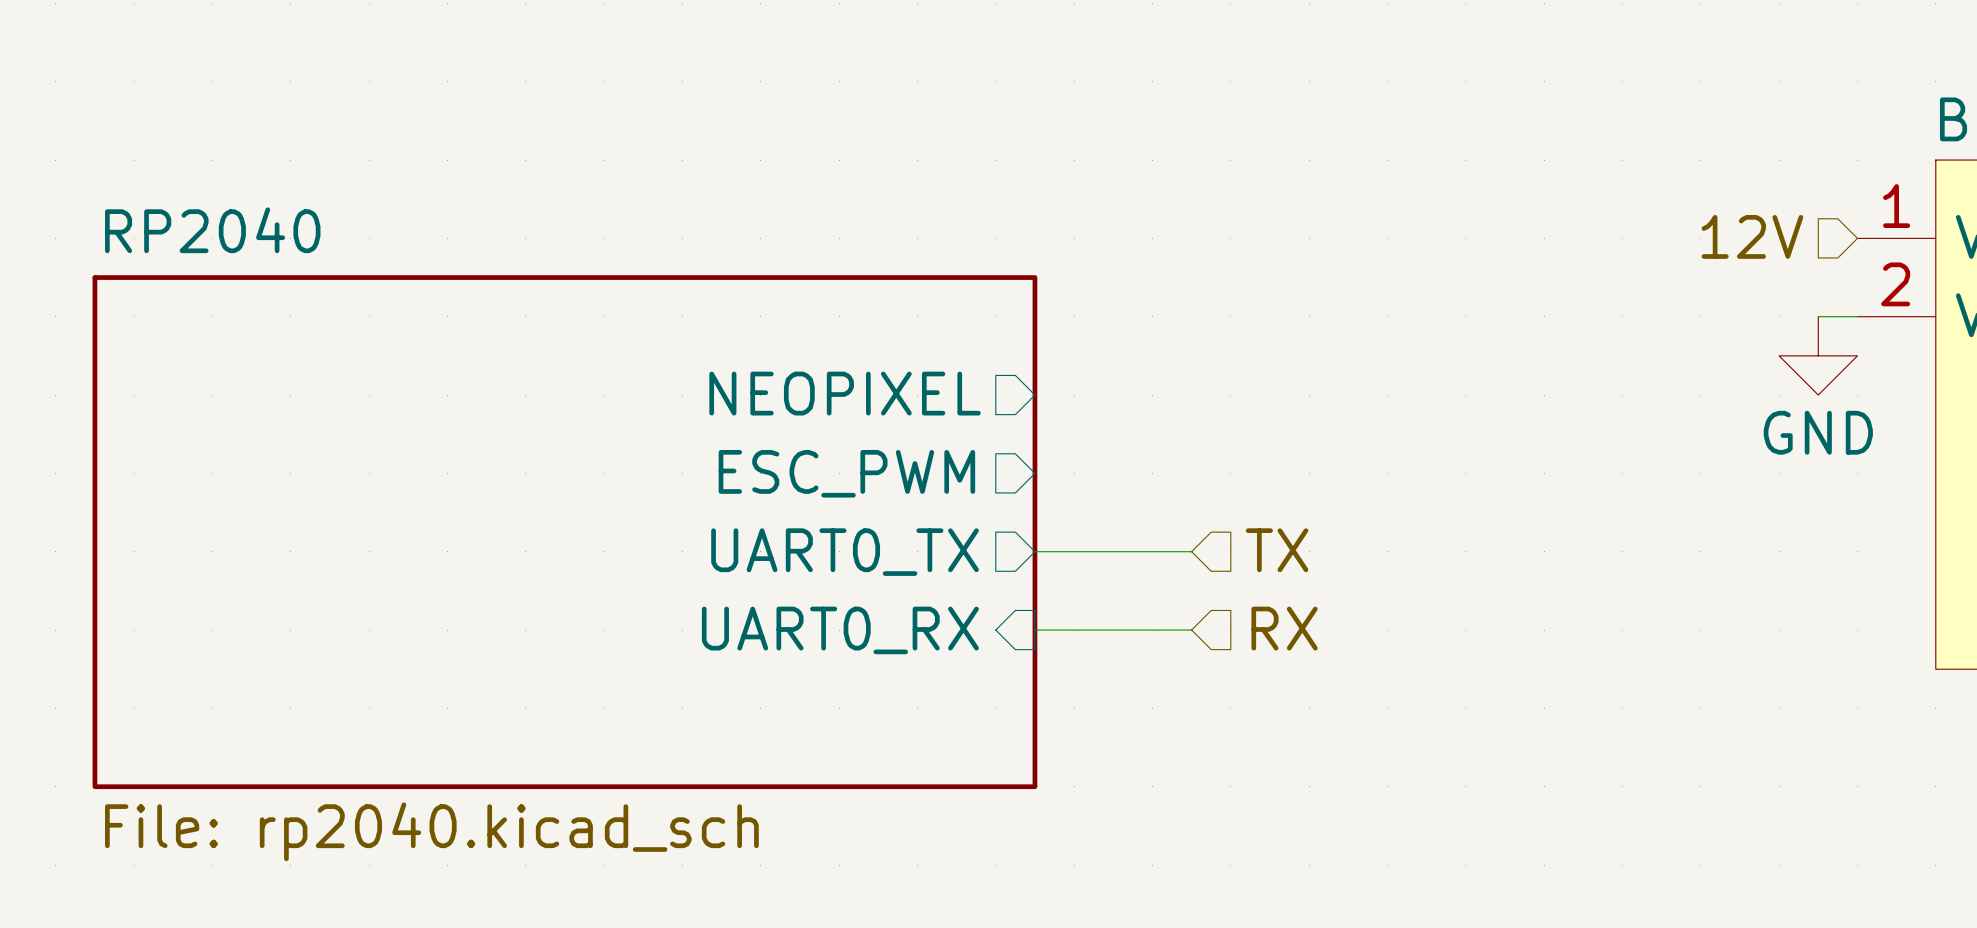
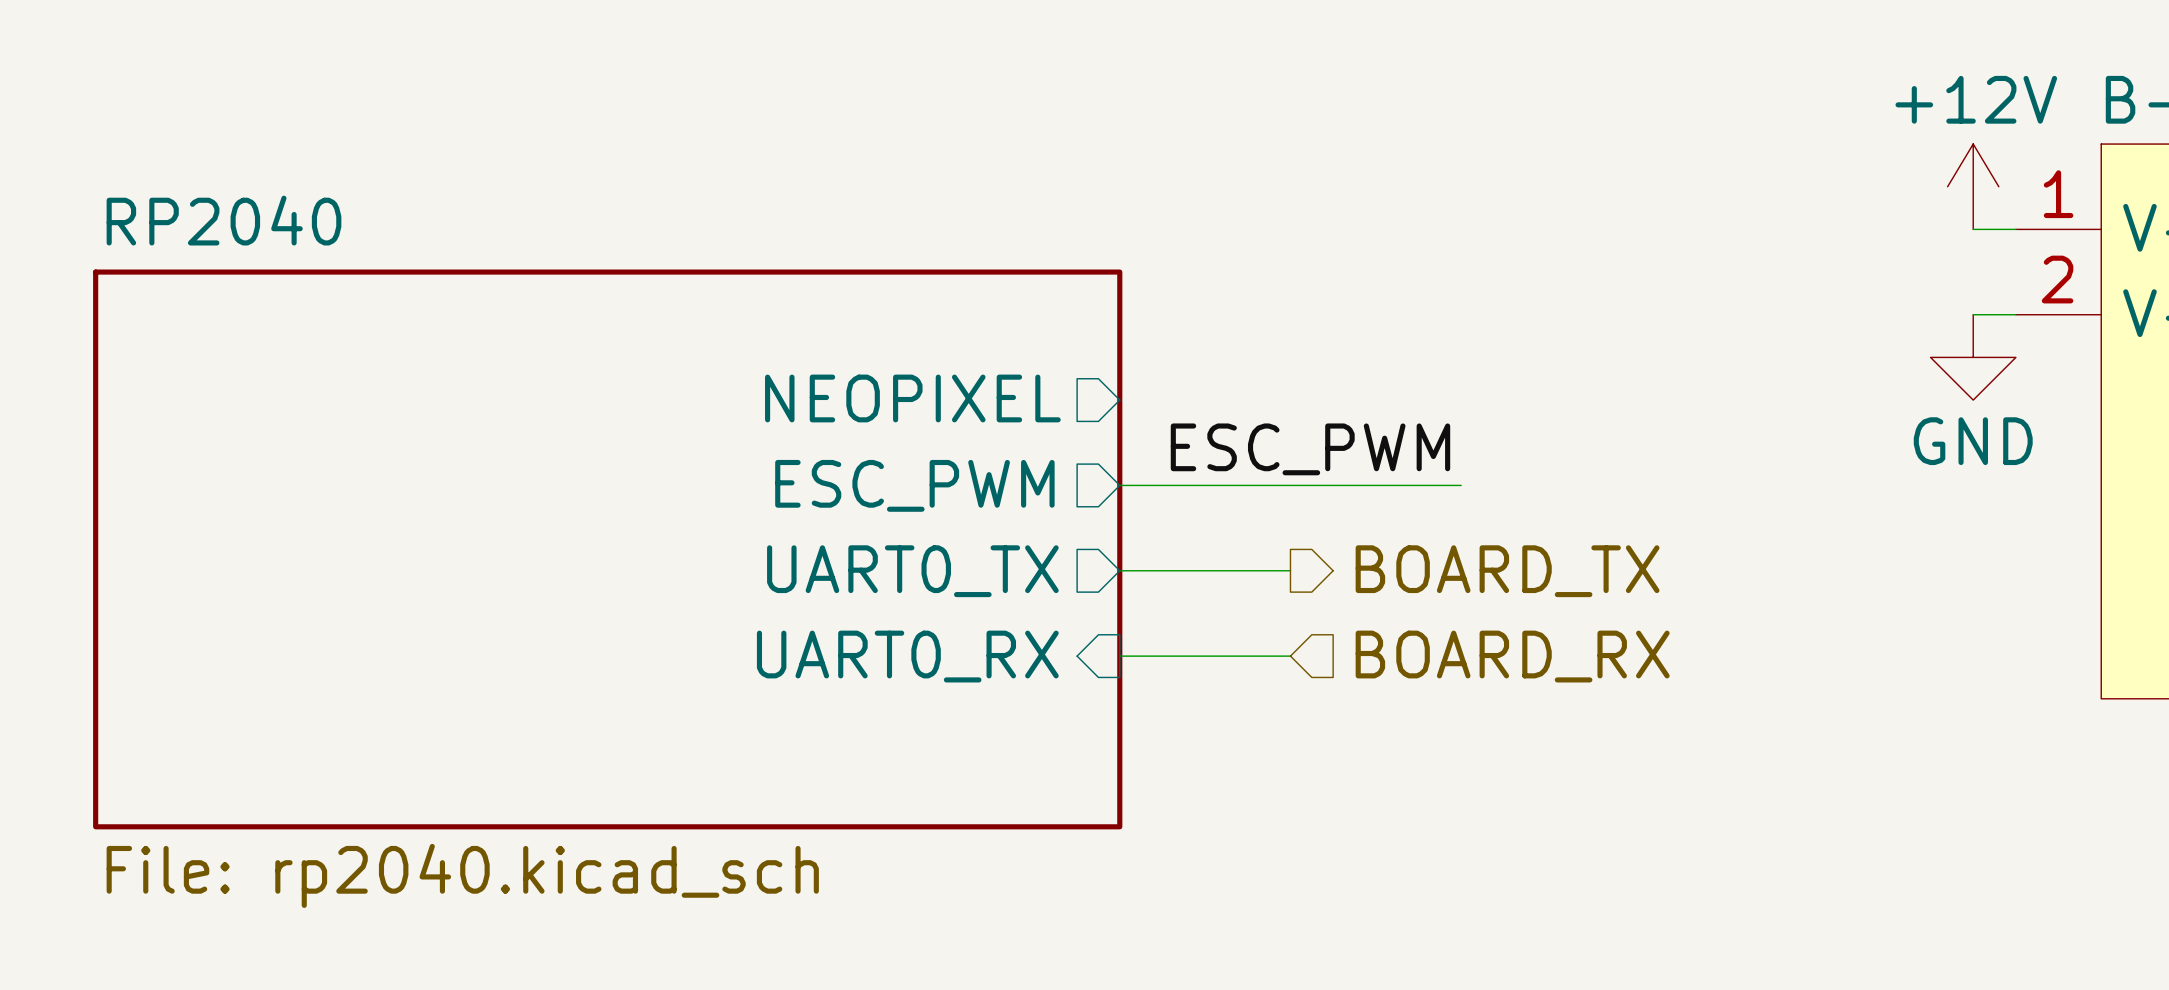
power symbol: none -> +12V (1973, 186)
hierarchical label: 12V (1752, 236) -> none
wire: none -> (1973, 229) (2015, 229)
label: none -> ESC_PWM (1310, 449)
wire: none -> (1119, 485) (1461, 485)
hierarchical label shape: input (1277, 550) -> output (1507, 571)
hierarchical label: TX (1277, 550) -> BOARD_TX (1507, 571)
hierarchical label: RX (1284, 628) -> BOARD_RX (1512, 656)

